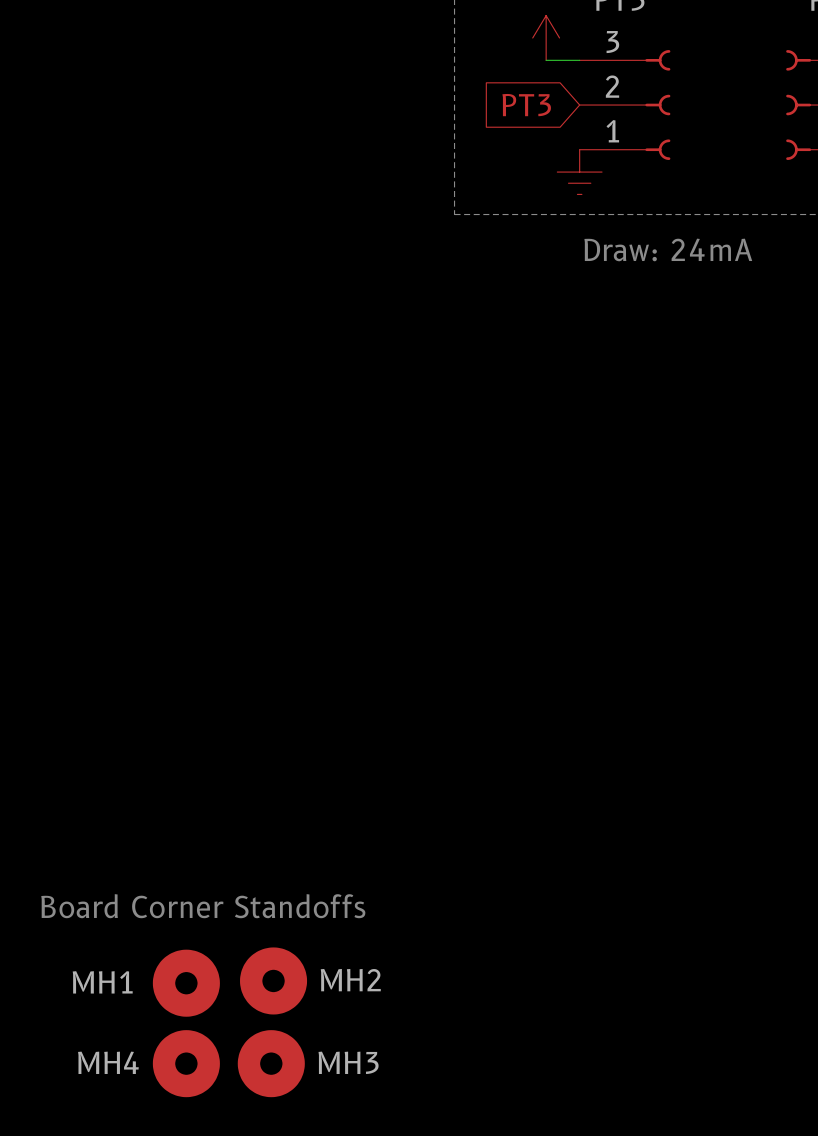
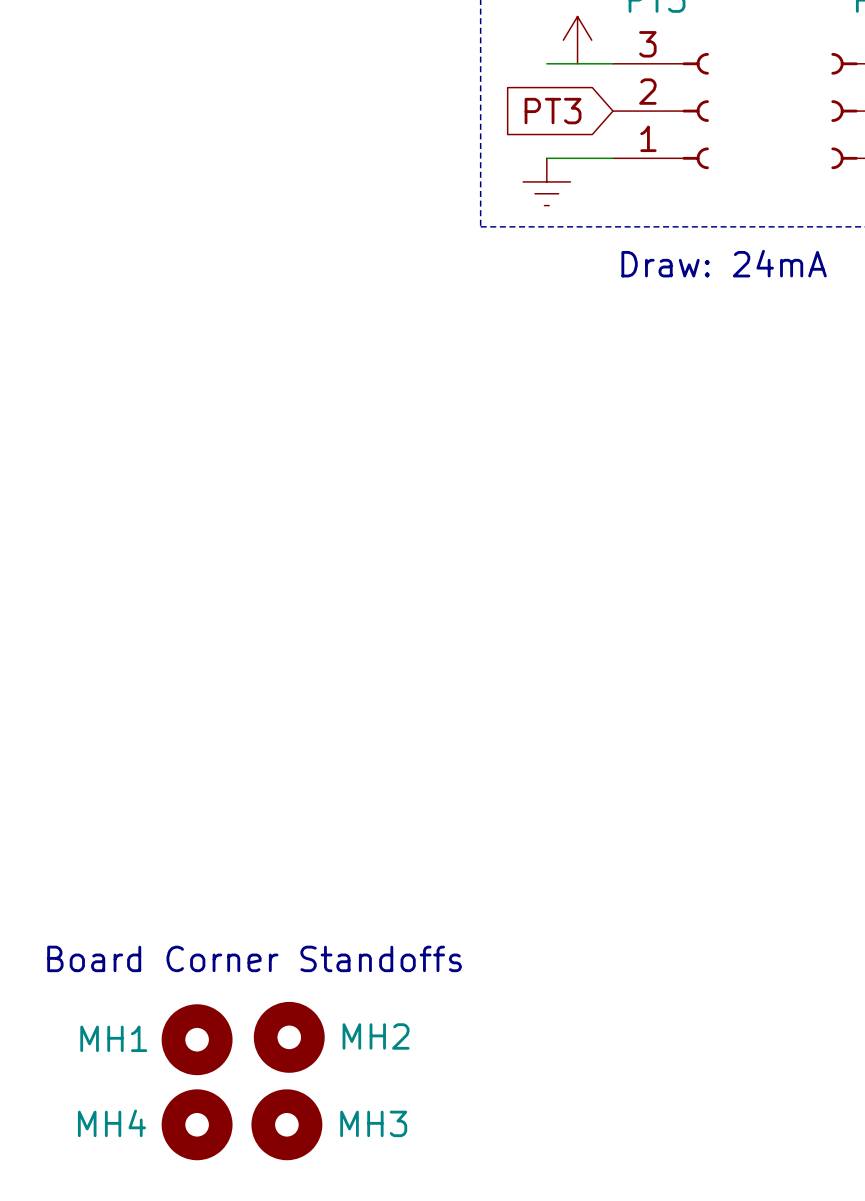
wire: none -> (546, 63) (577, 63)
wire: none -> (546, 158) (612, 158)
power symbol position: (579, 172) -> (546, 181)

